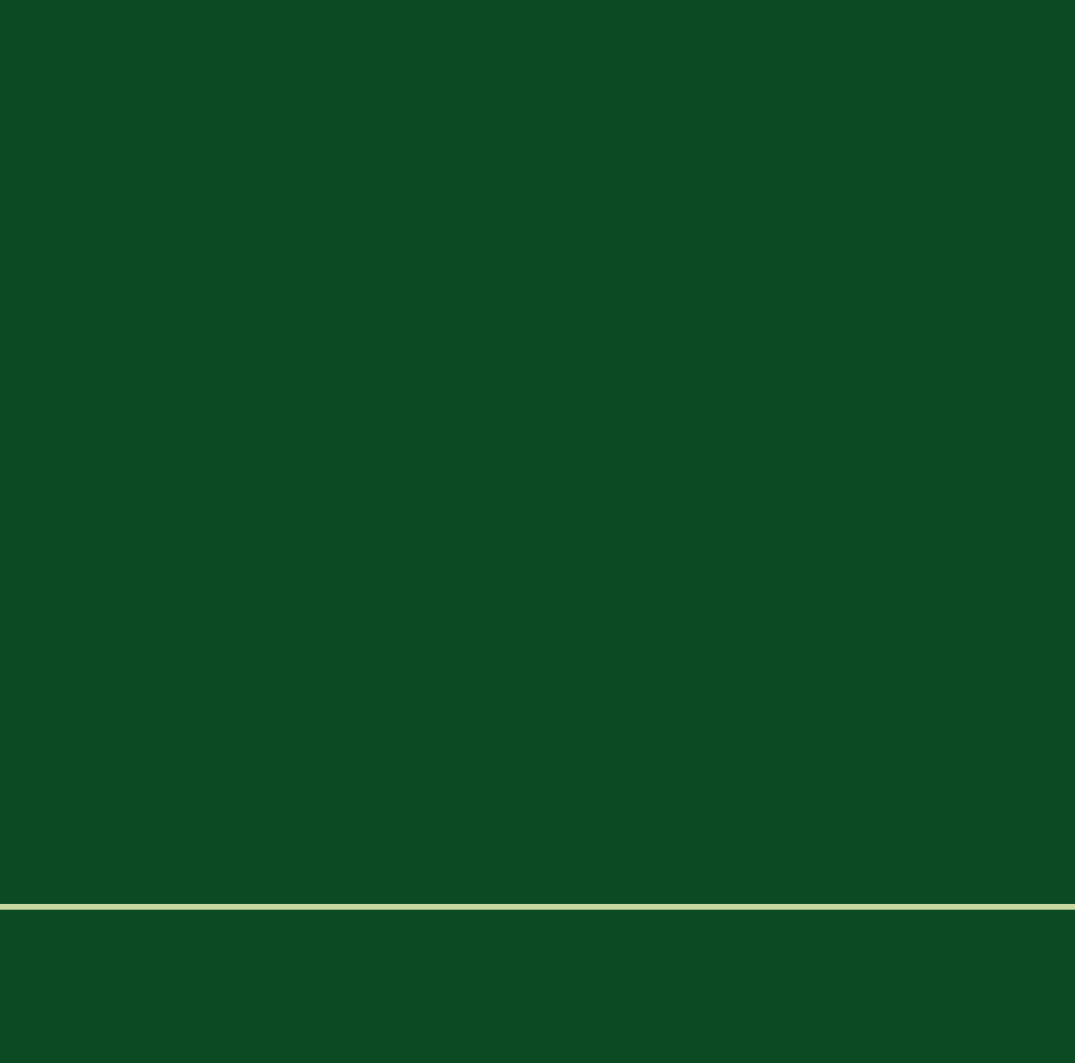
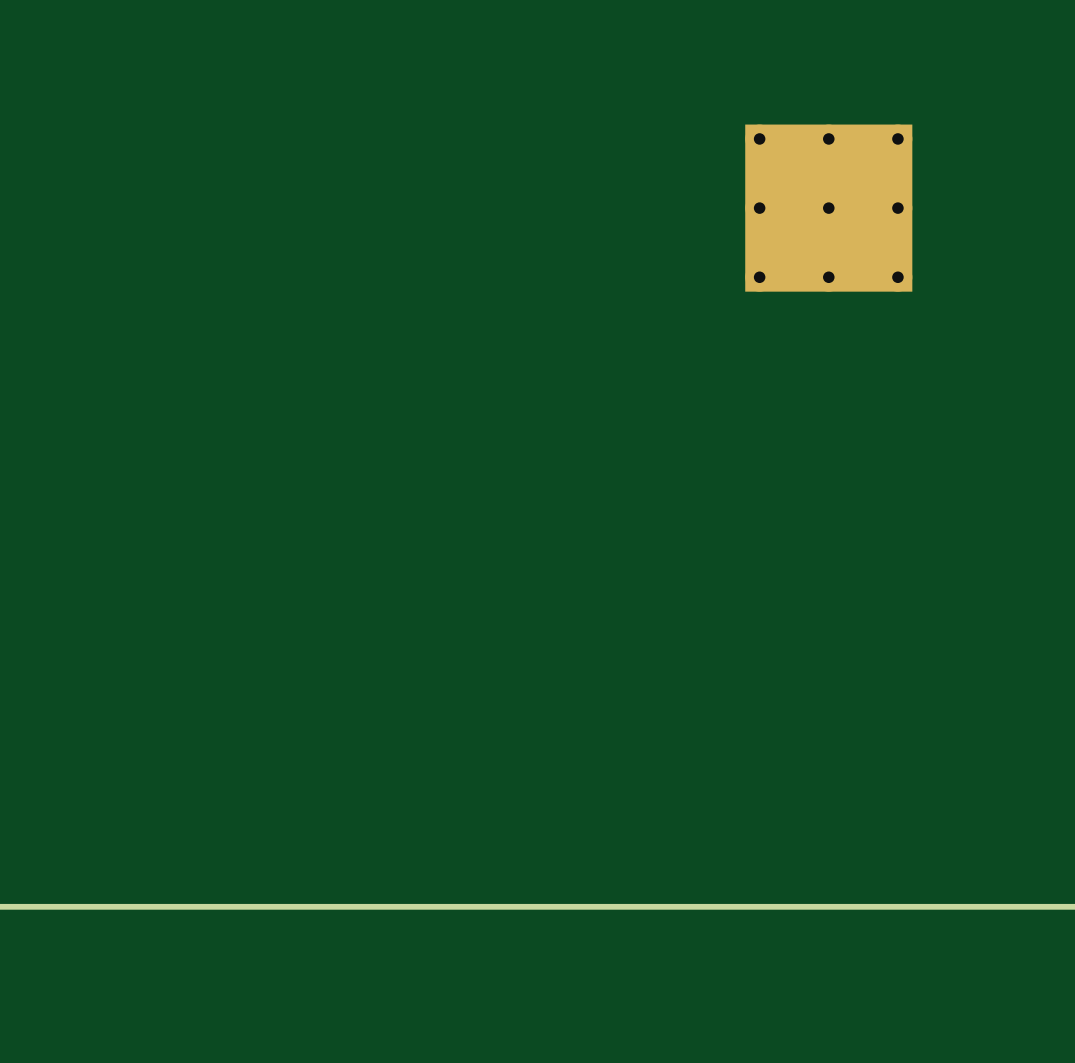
part: none -> (828, 208)

